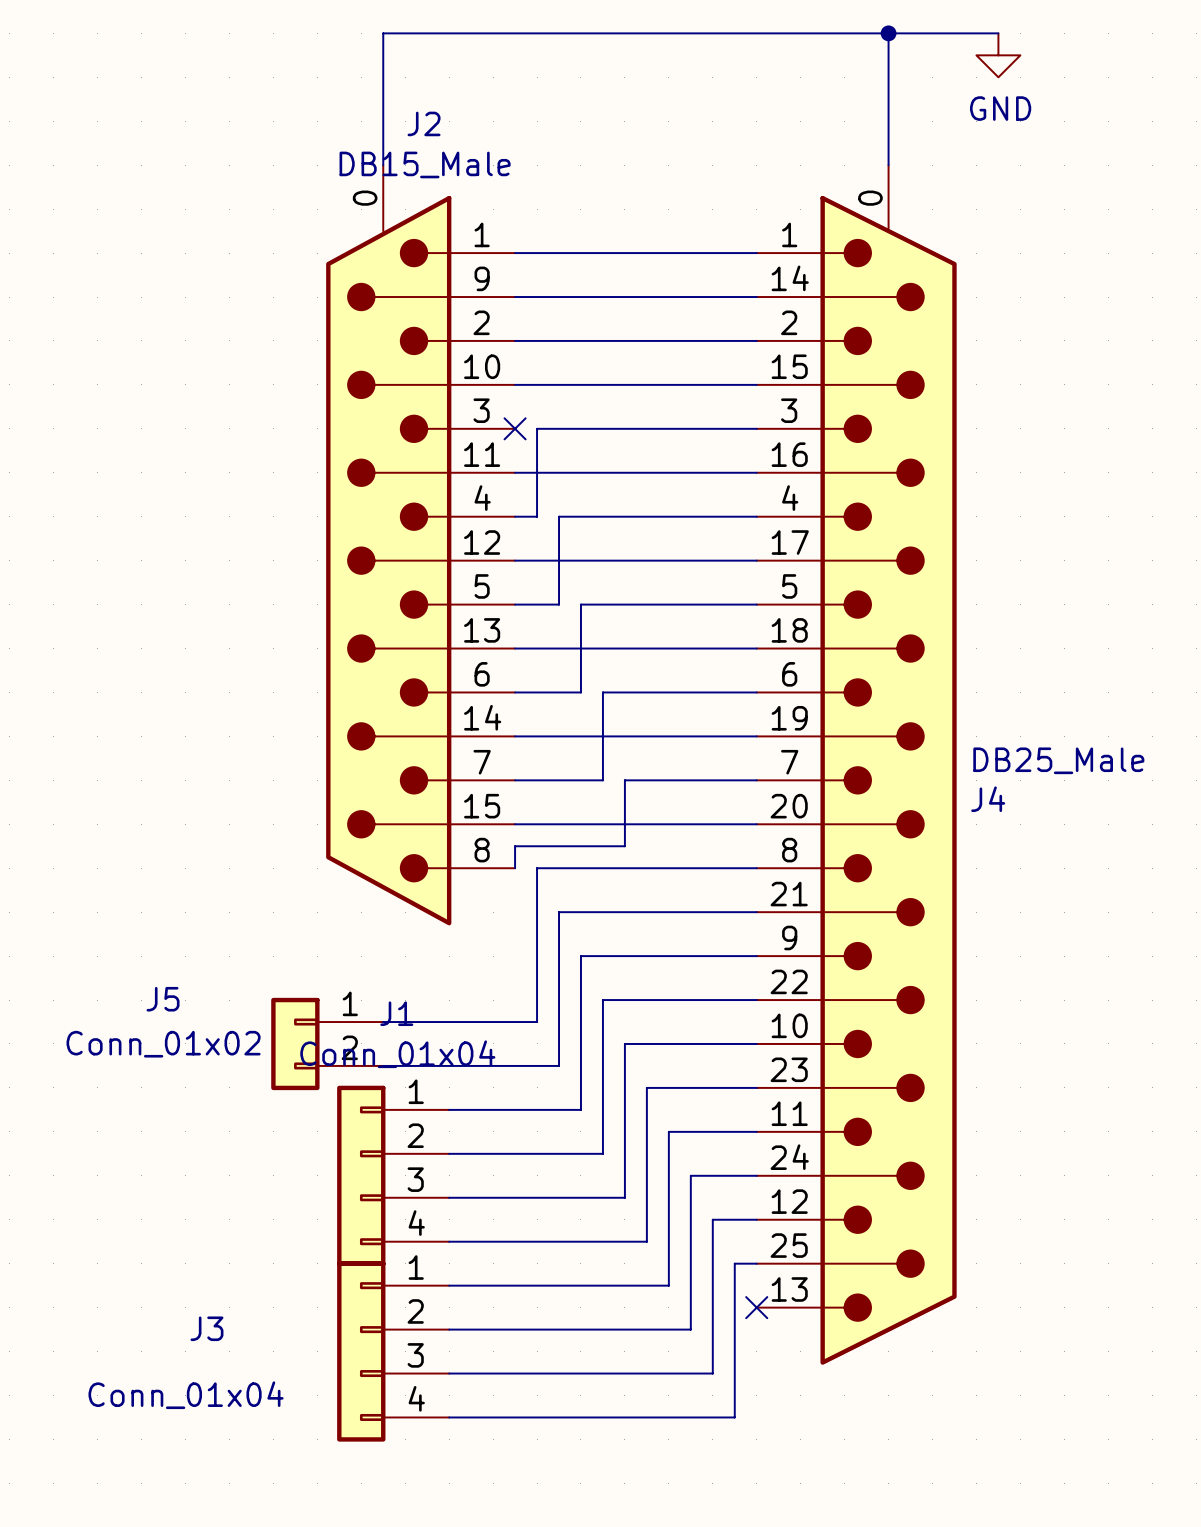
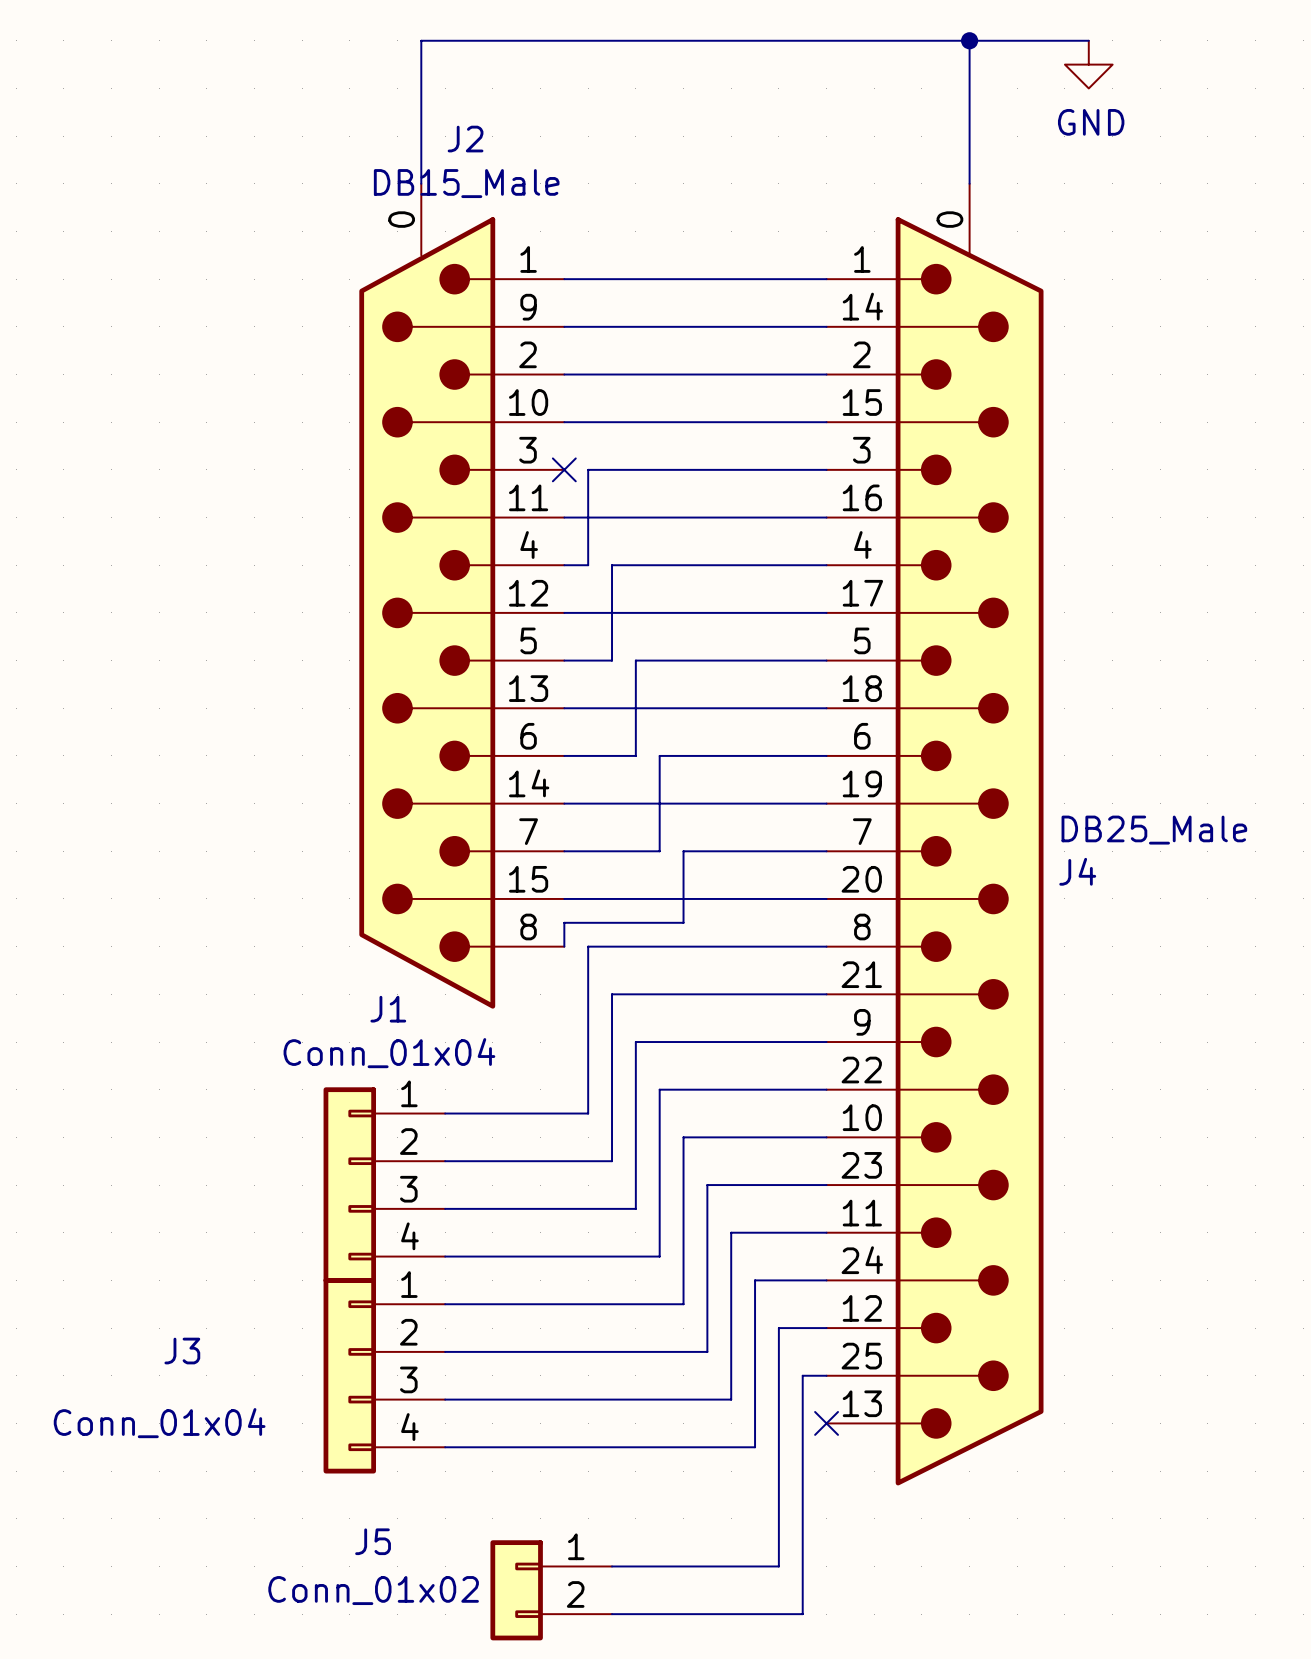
J5 position: (327, 1043) -> (551, 1590)
J1 position: (393, 1175) -> (384, 1185)
J3 position: (393, 1351) -> (384, 1375)
wire: (449, 1373) (712, 1373) -> (612, 1566) (778, 1566) (778, 1494)
wire: (449, 1417) (734, 1417) -> (612, 1614) (802, 1614) (802, 1542)

